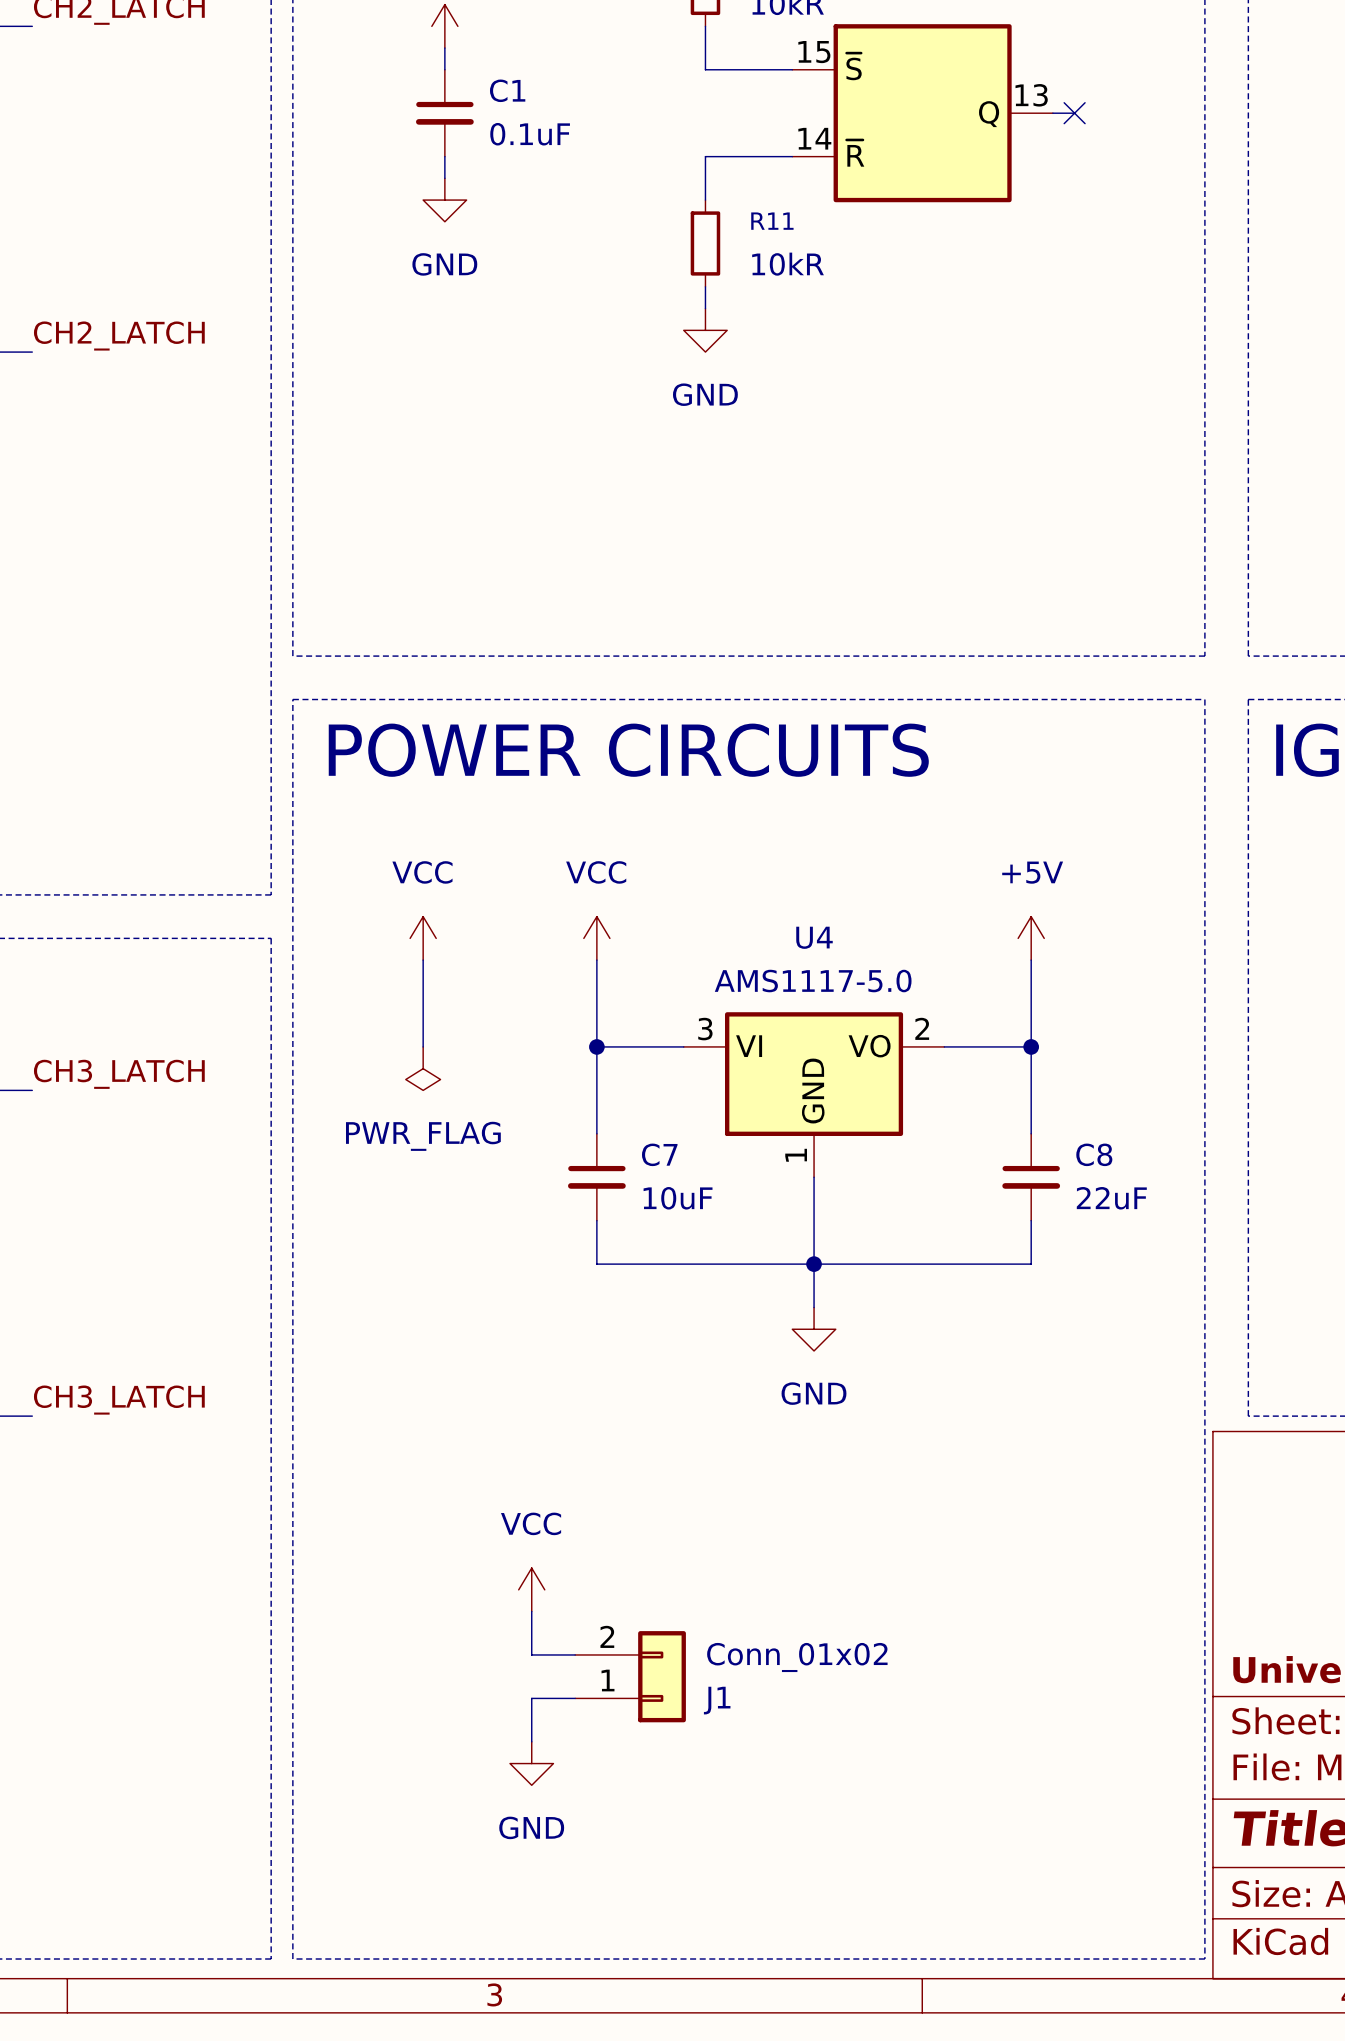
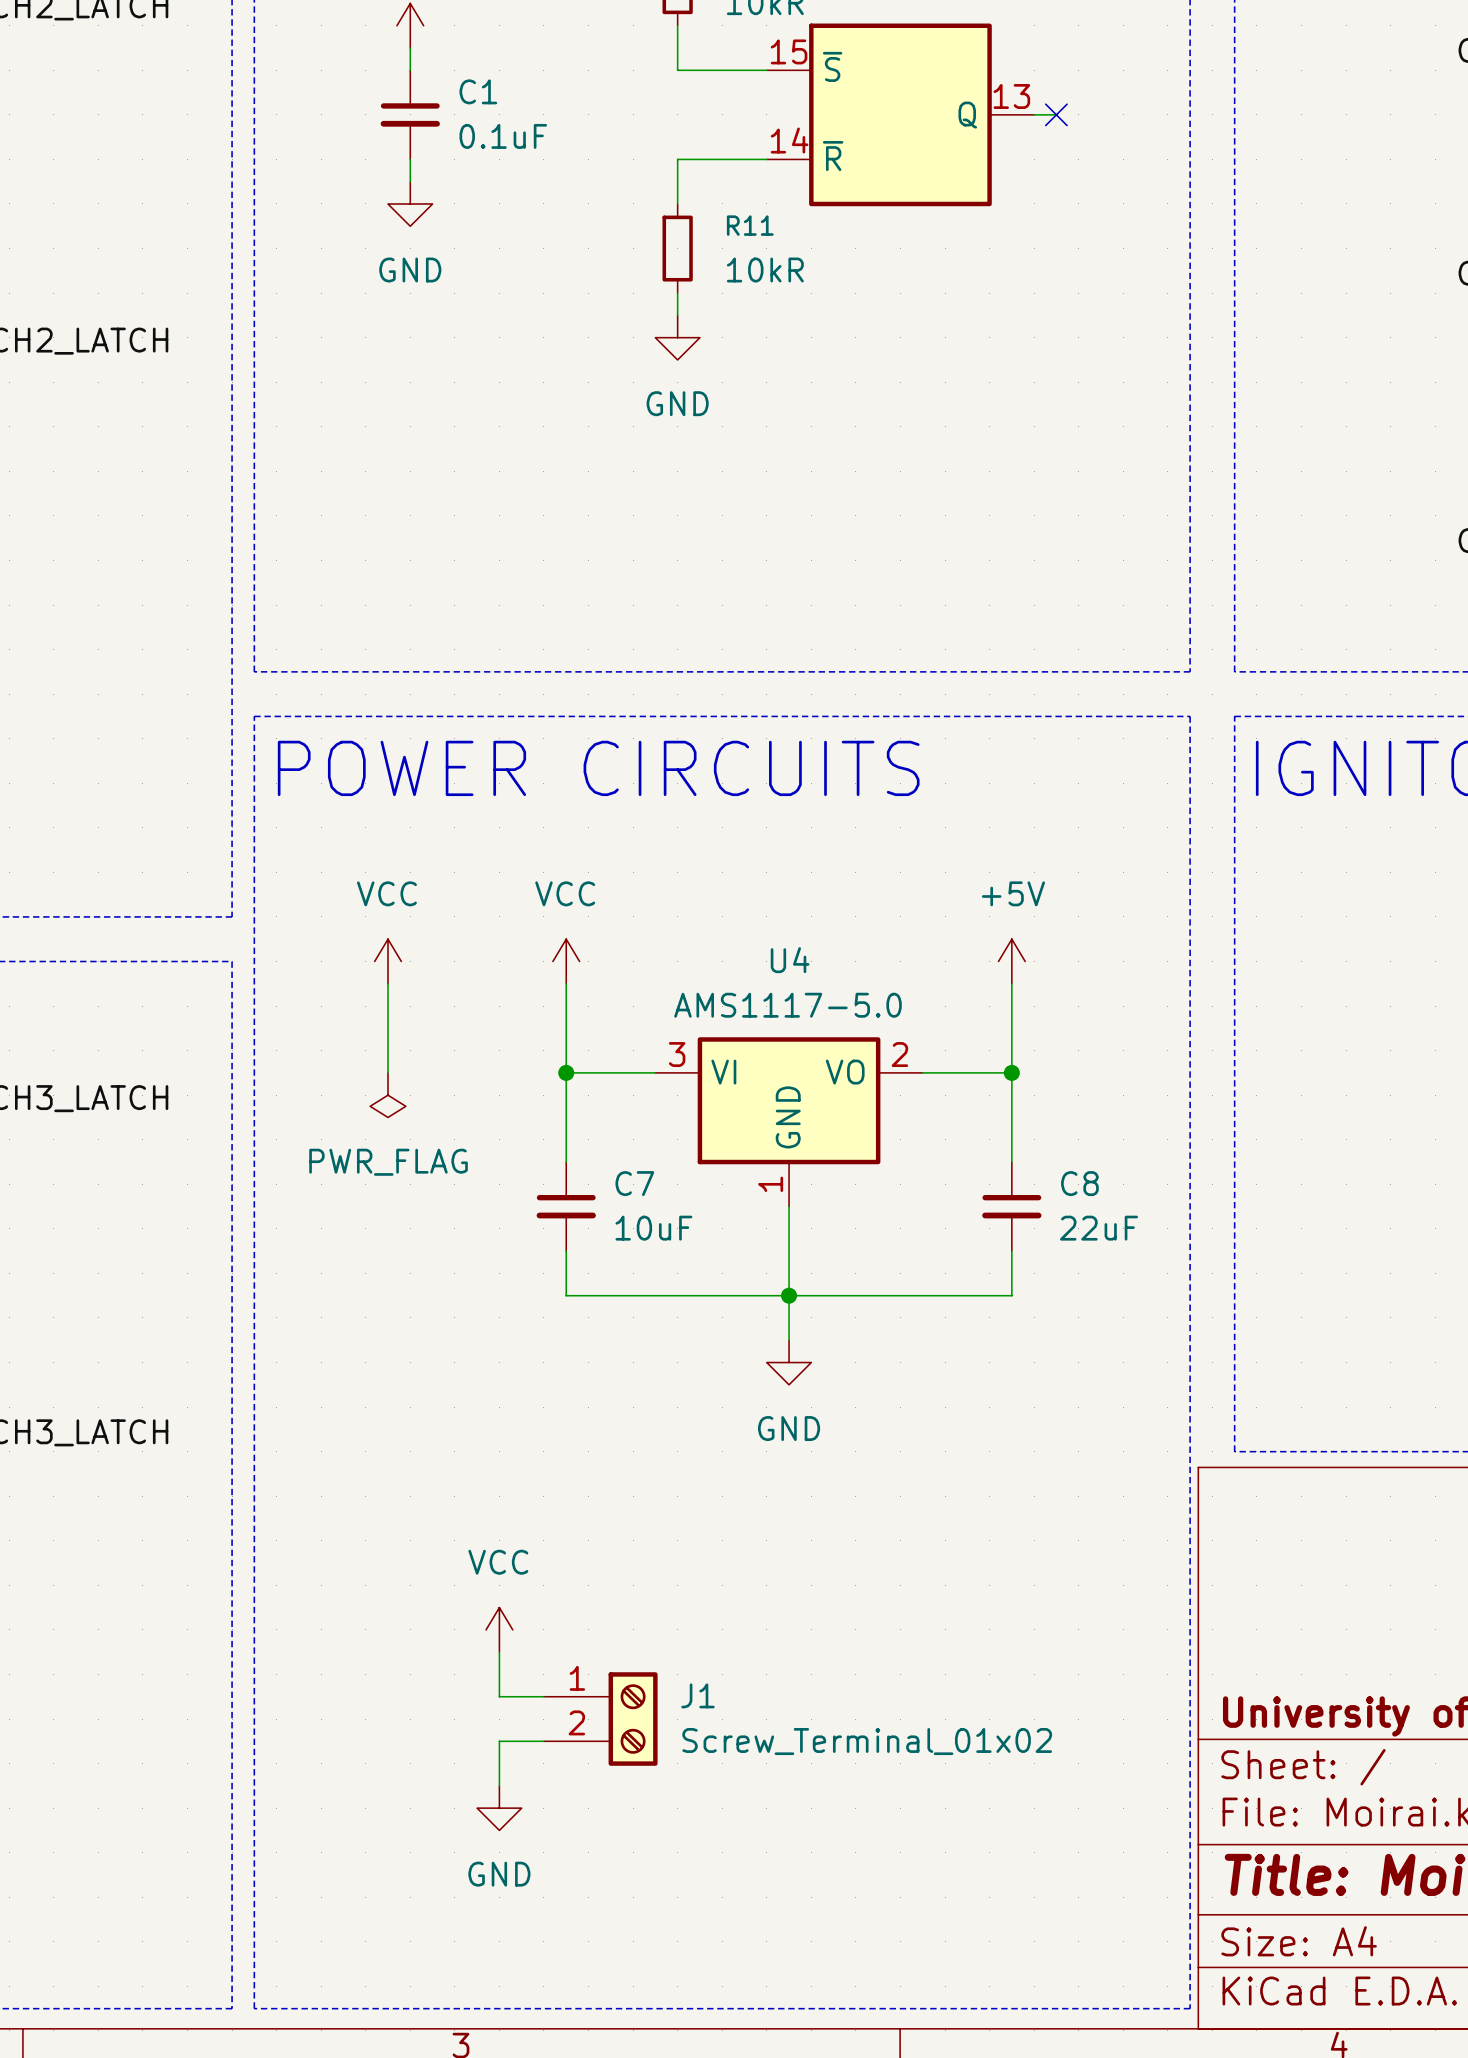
J1 symbol: [575, 1631, 686, 1723] -> [543, 1672, 658, 1766]
J1 value: Conn_01x02 (797, 1657) -> Screw_Terminal_01x02 (867, 1741)
J1 name position: J1 (717, 1700) -> J1 (697, 1695)

